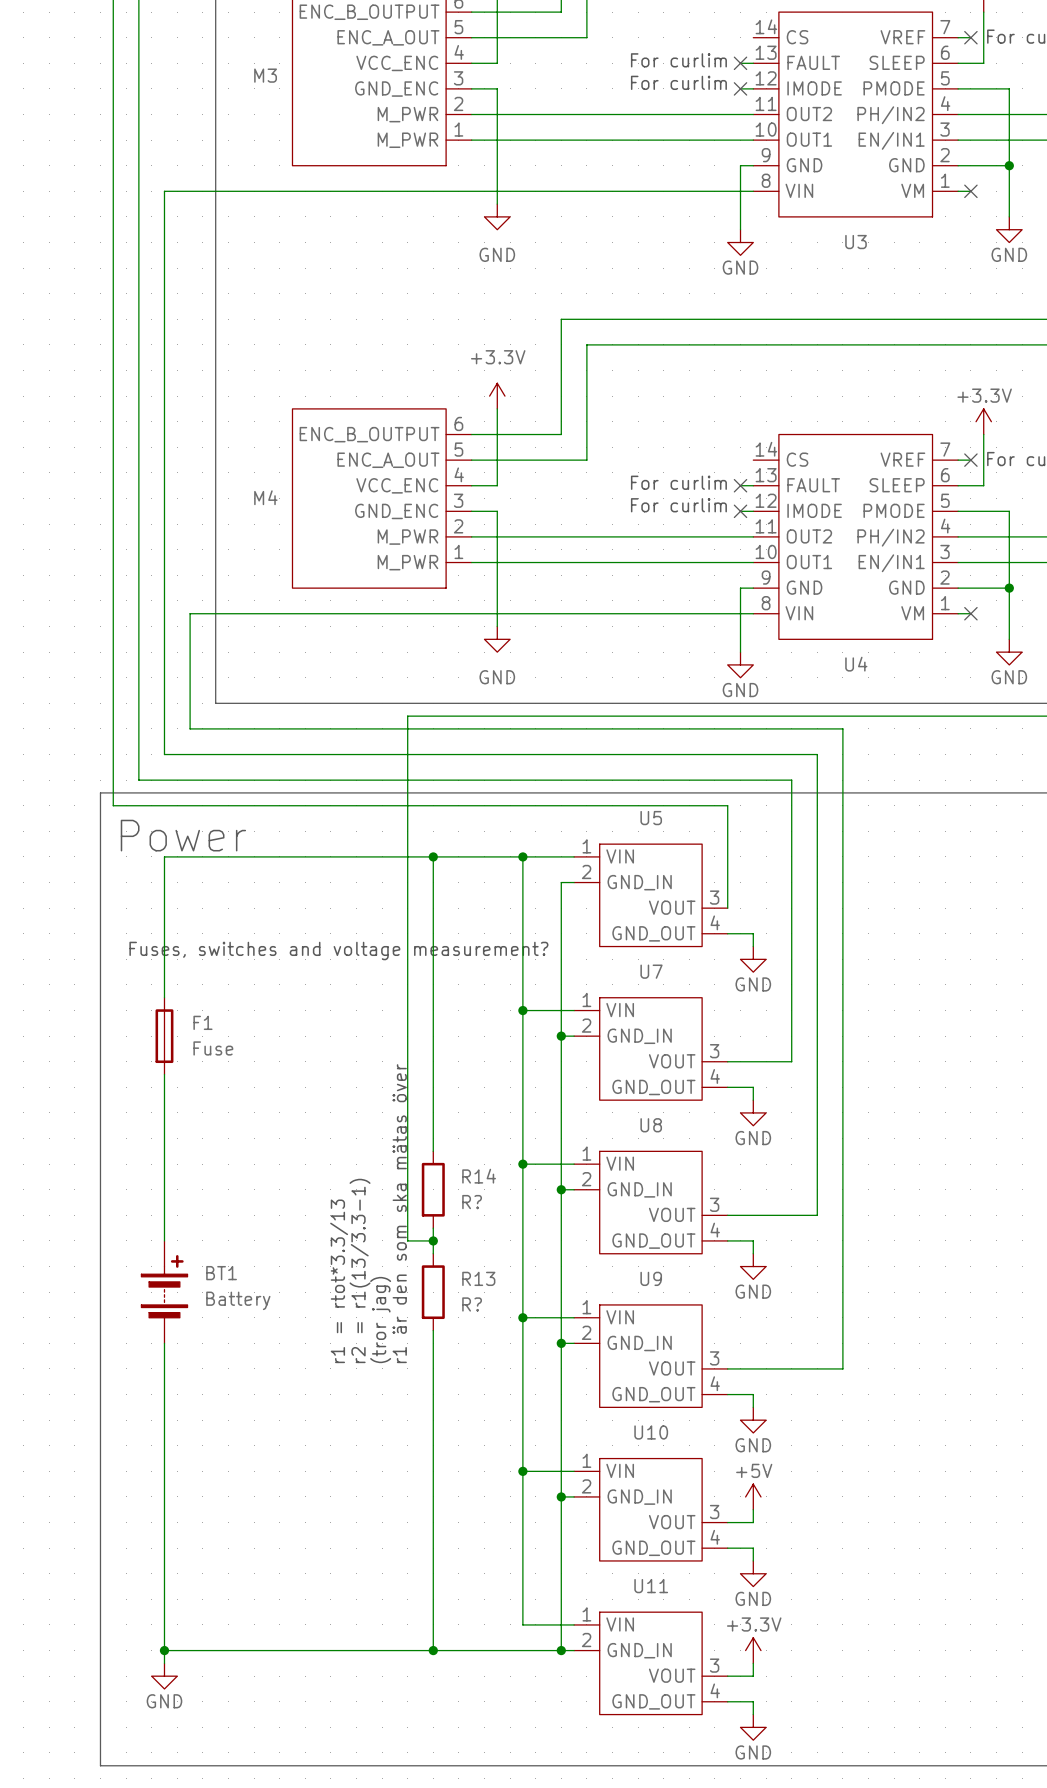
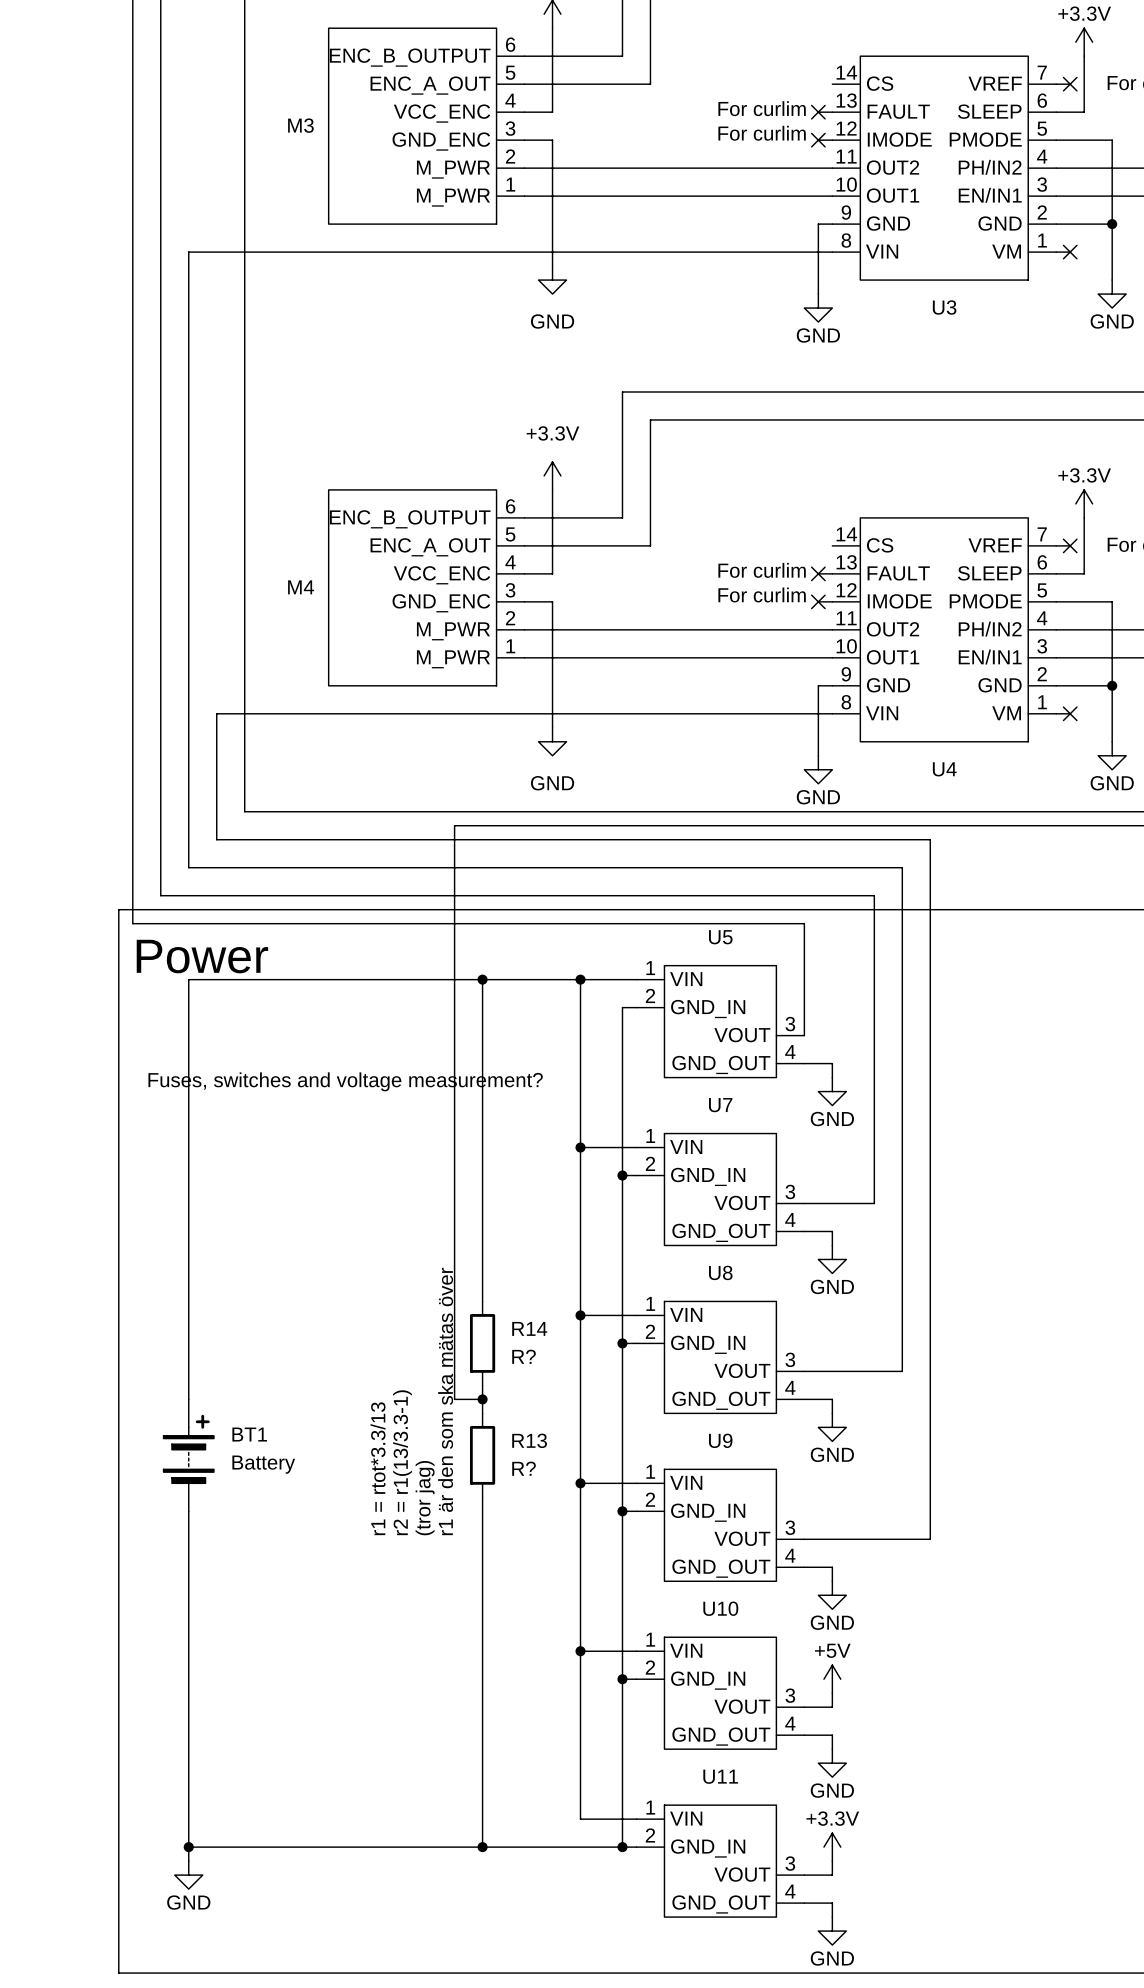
F1: Fuse (164, 1036) -> none

